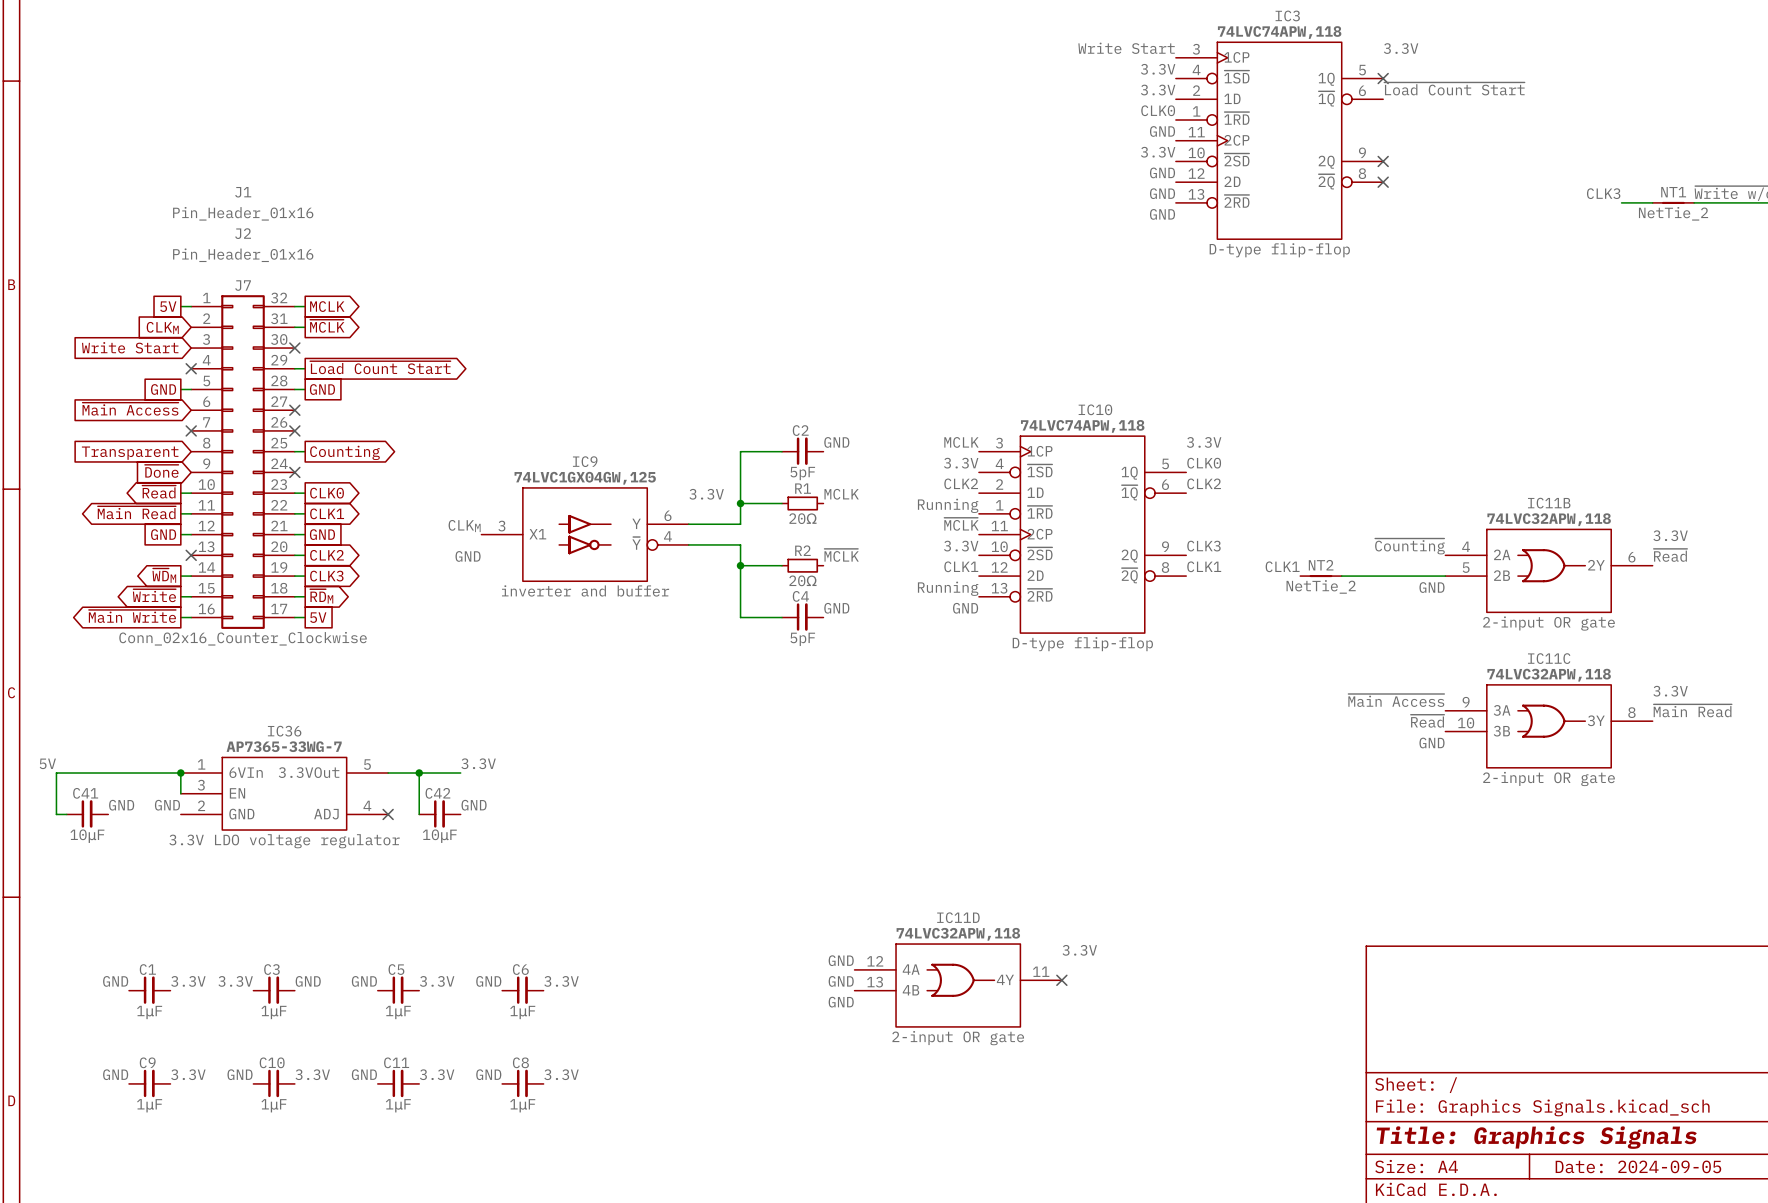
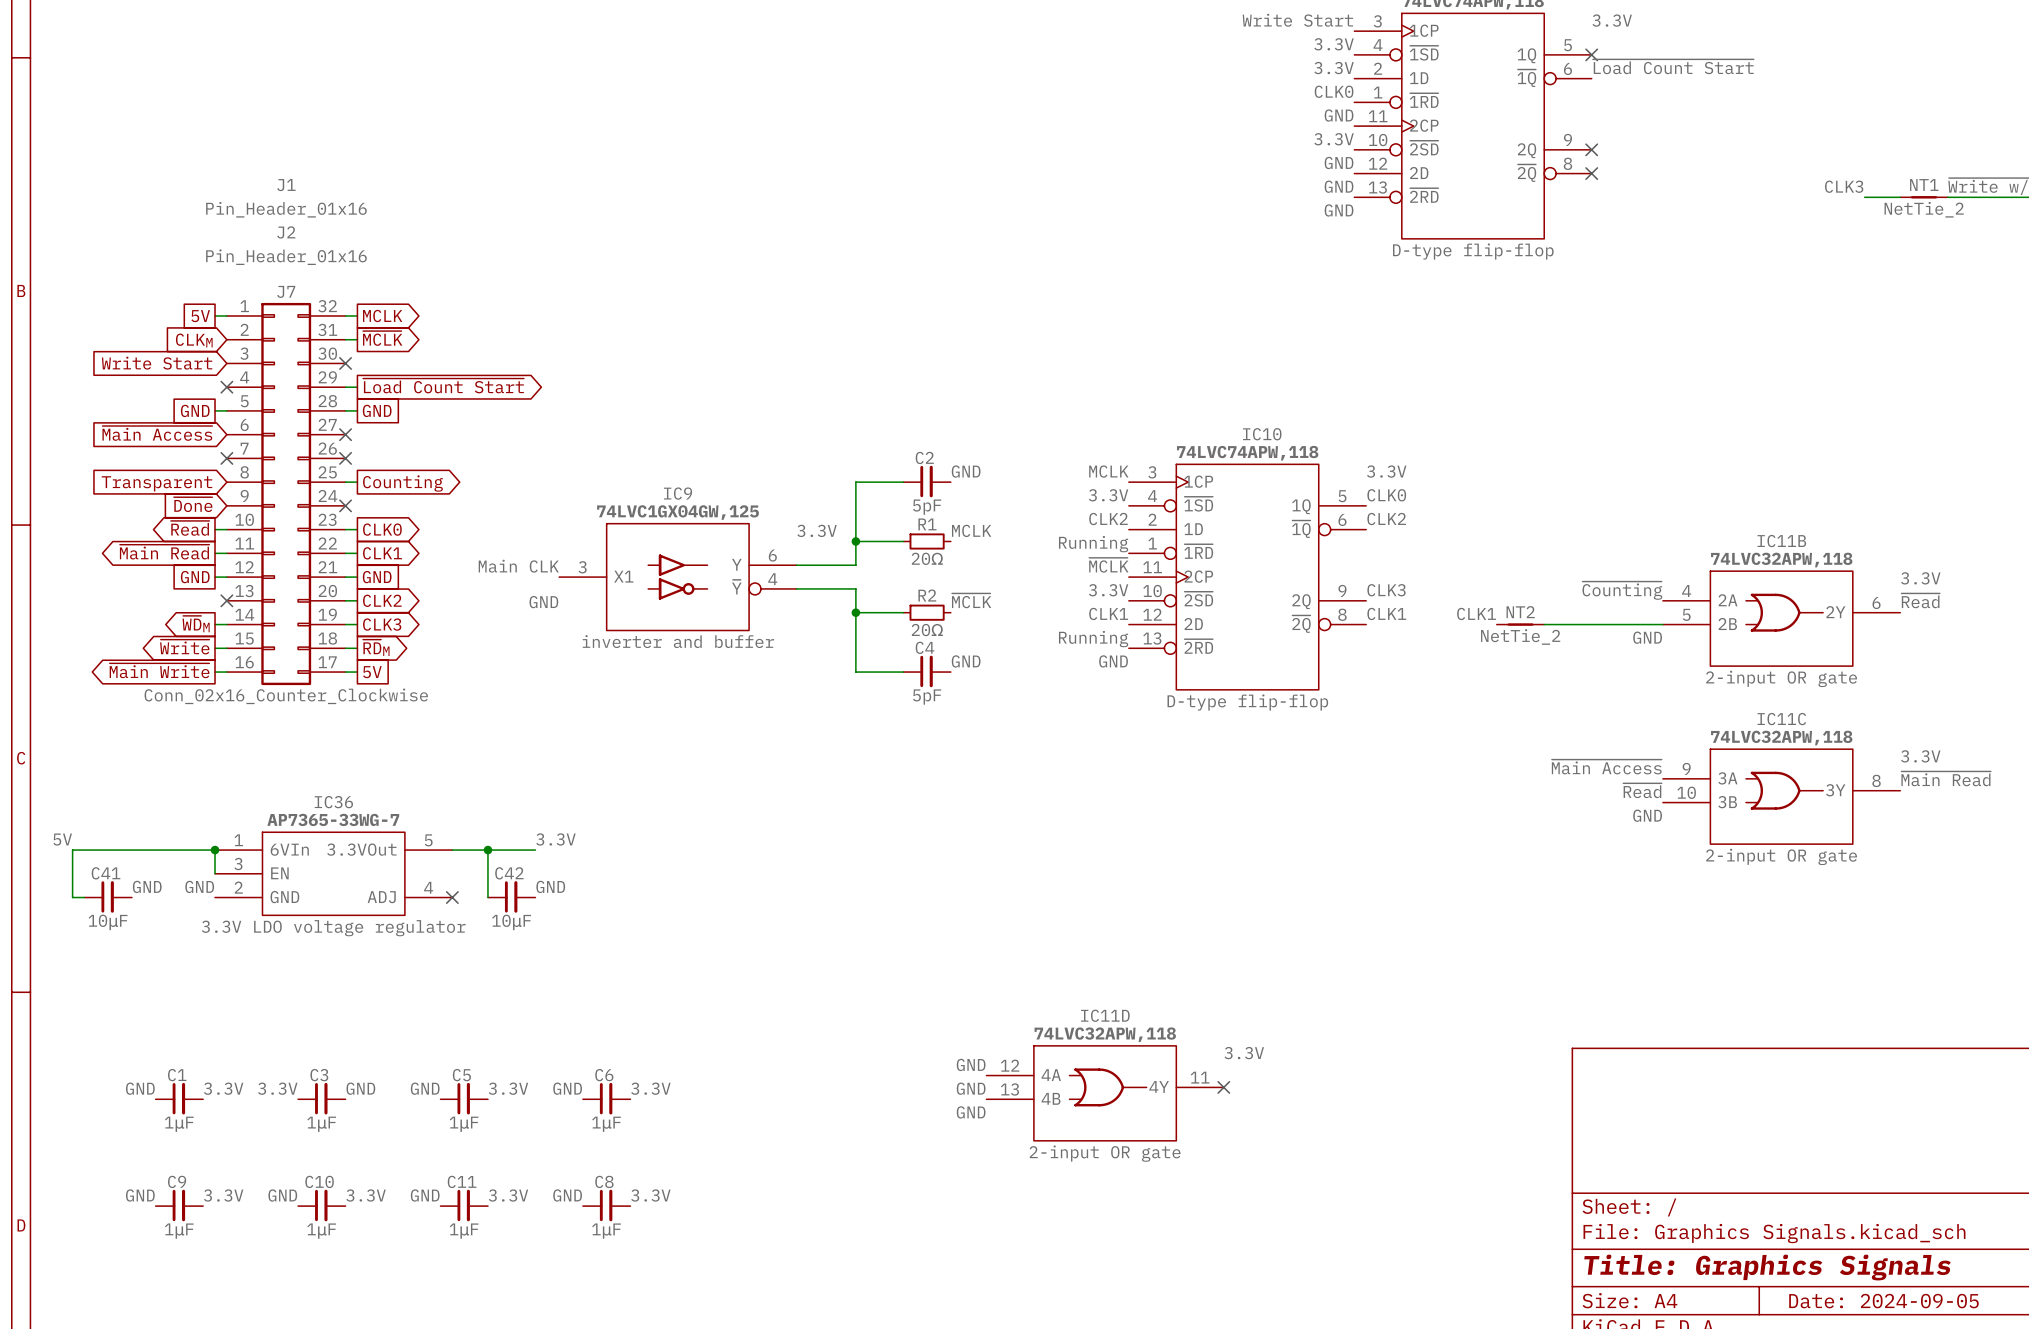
label: CLKM (464, 526) -> Main CLK (518, 566)

